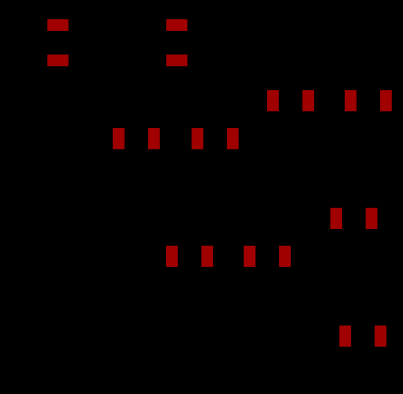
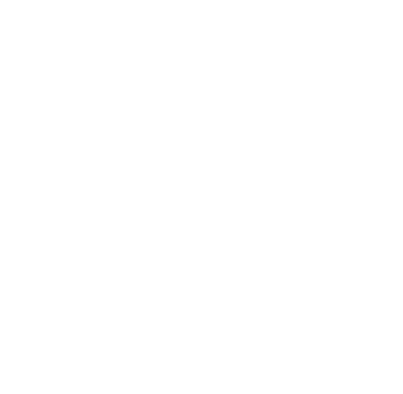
part: (57, 42) -> none
part: (176, 42) -> none
part: (290, 100) -> none
part: (368, 100) -> none
part: (136, 138) -> none
part: (215, 138) -> none
part: (353, 218) -> none
part: (189, 256) -> none
part: (267, 256) -> none
part: (362, 336) -> none

